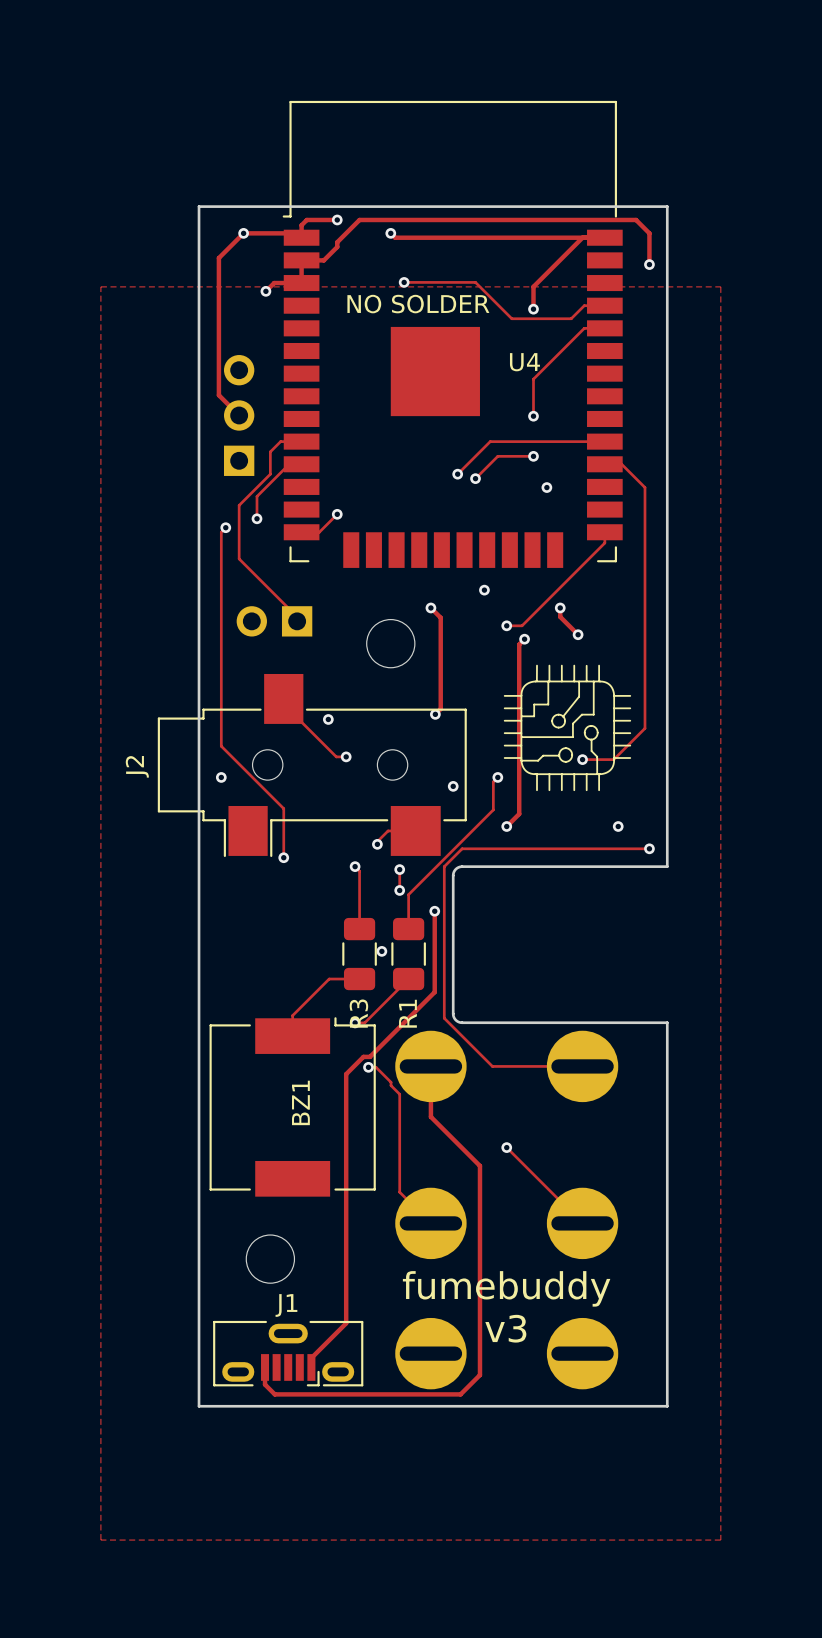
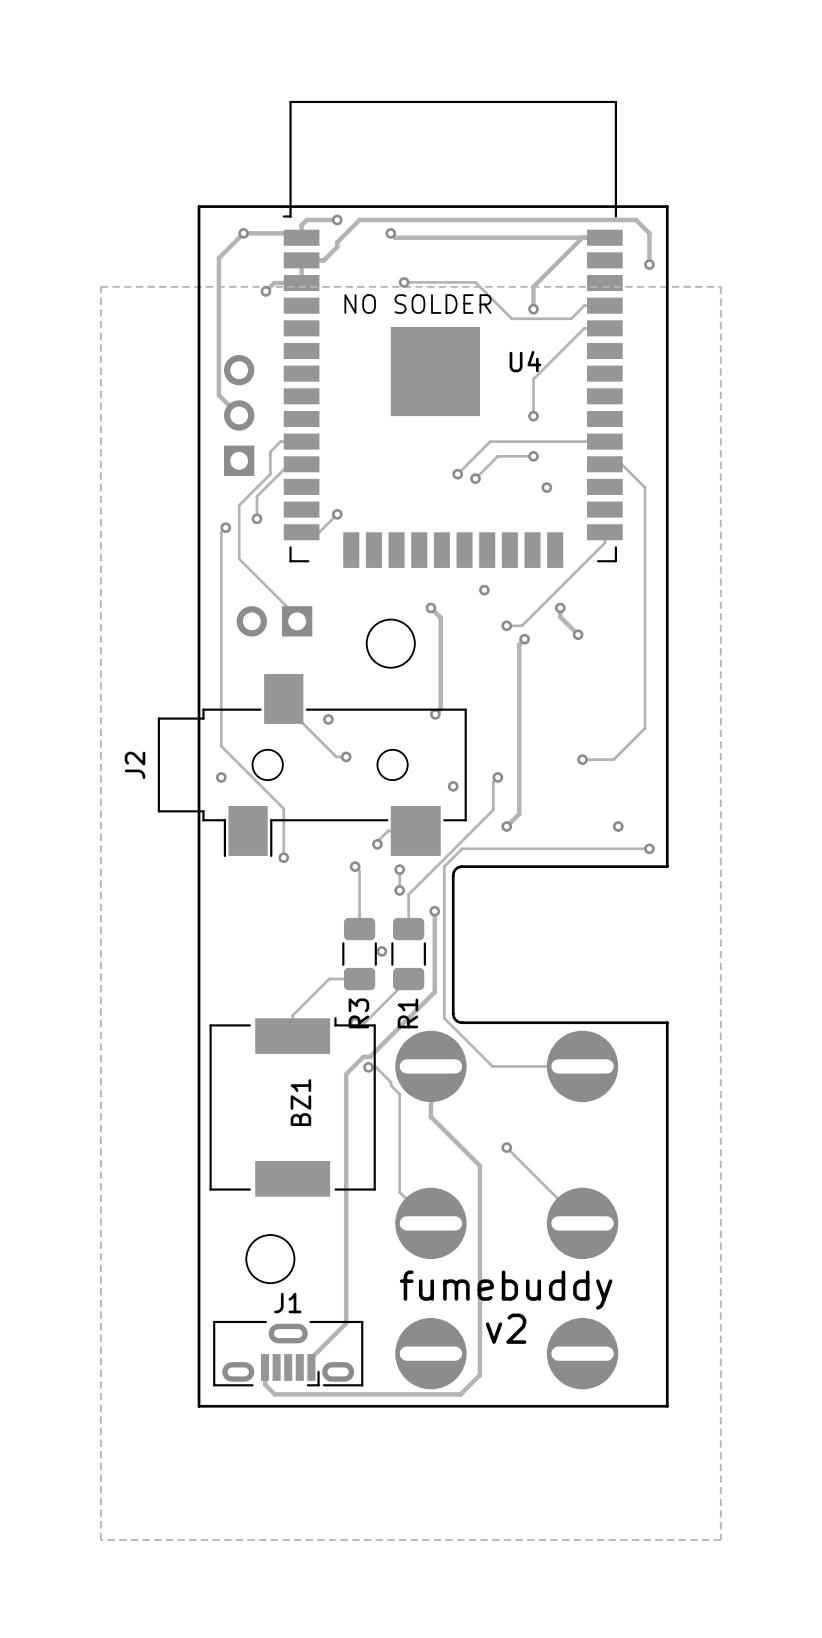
drawing: [503, 664, 632, 792] -> none
text: v3 (505, 1328) -> v2 (506, 1328)

